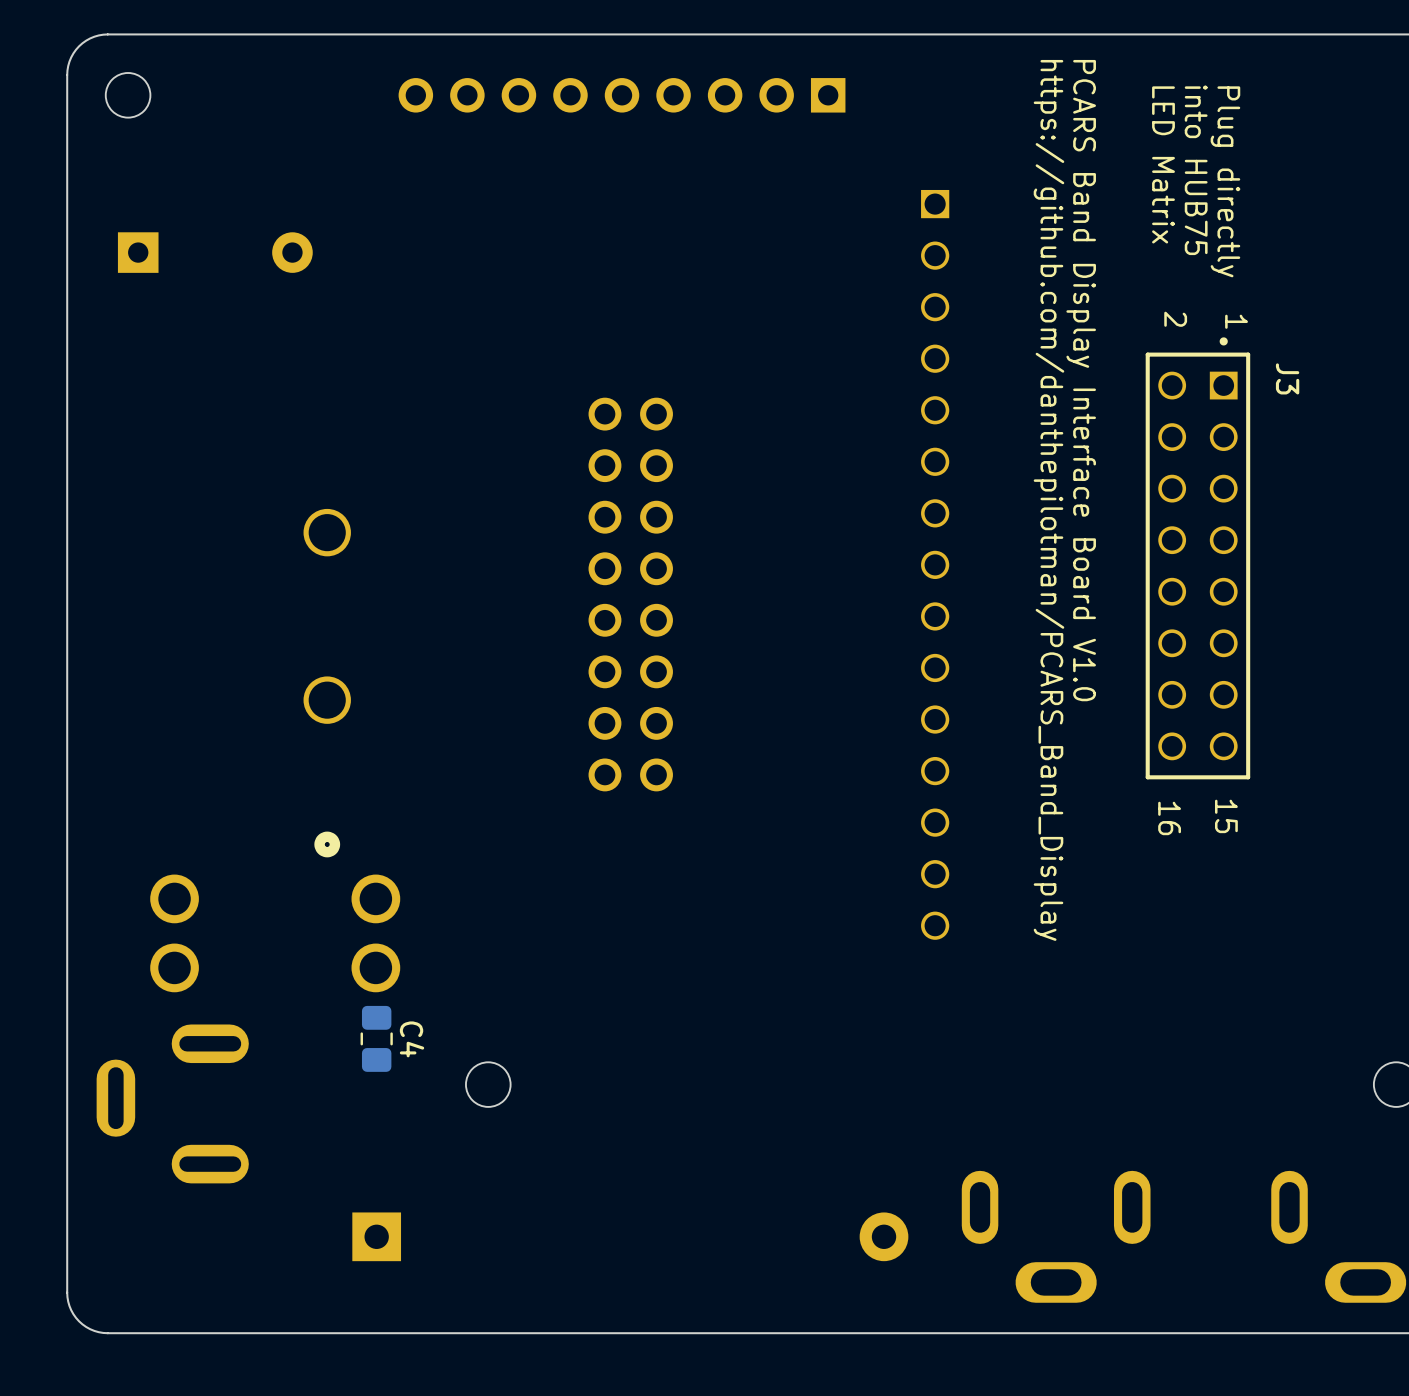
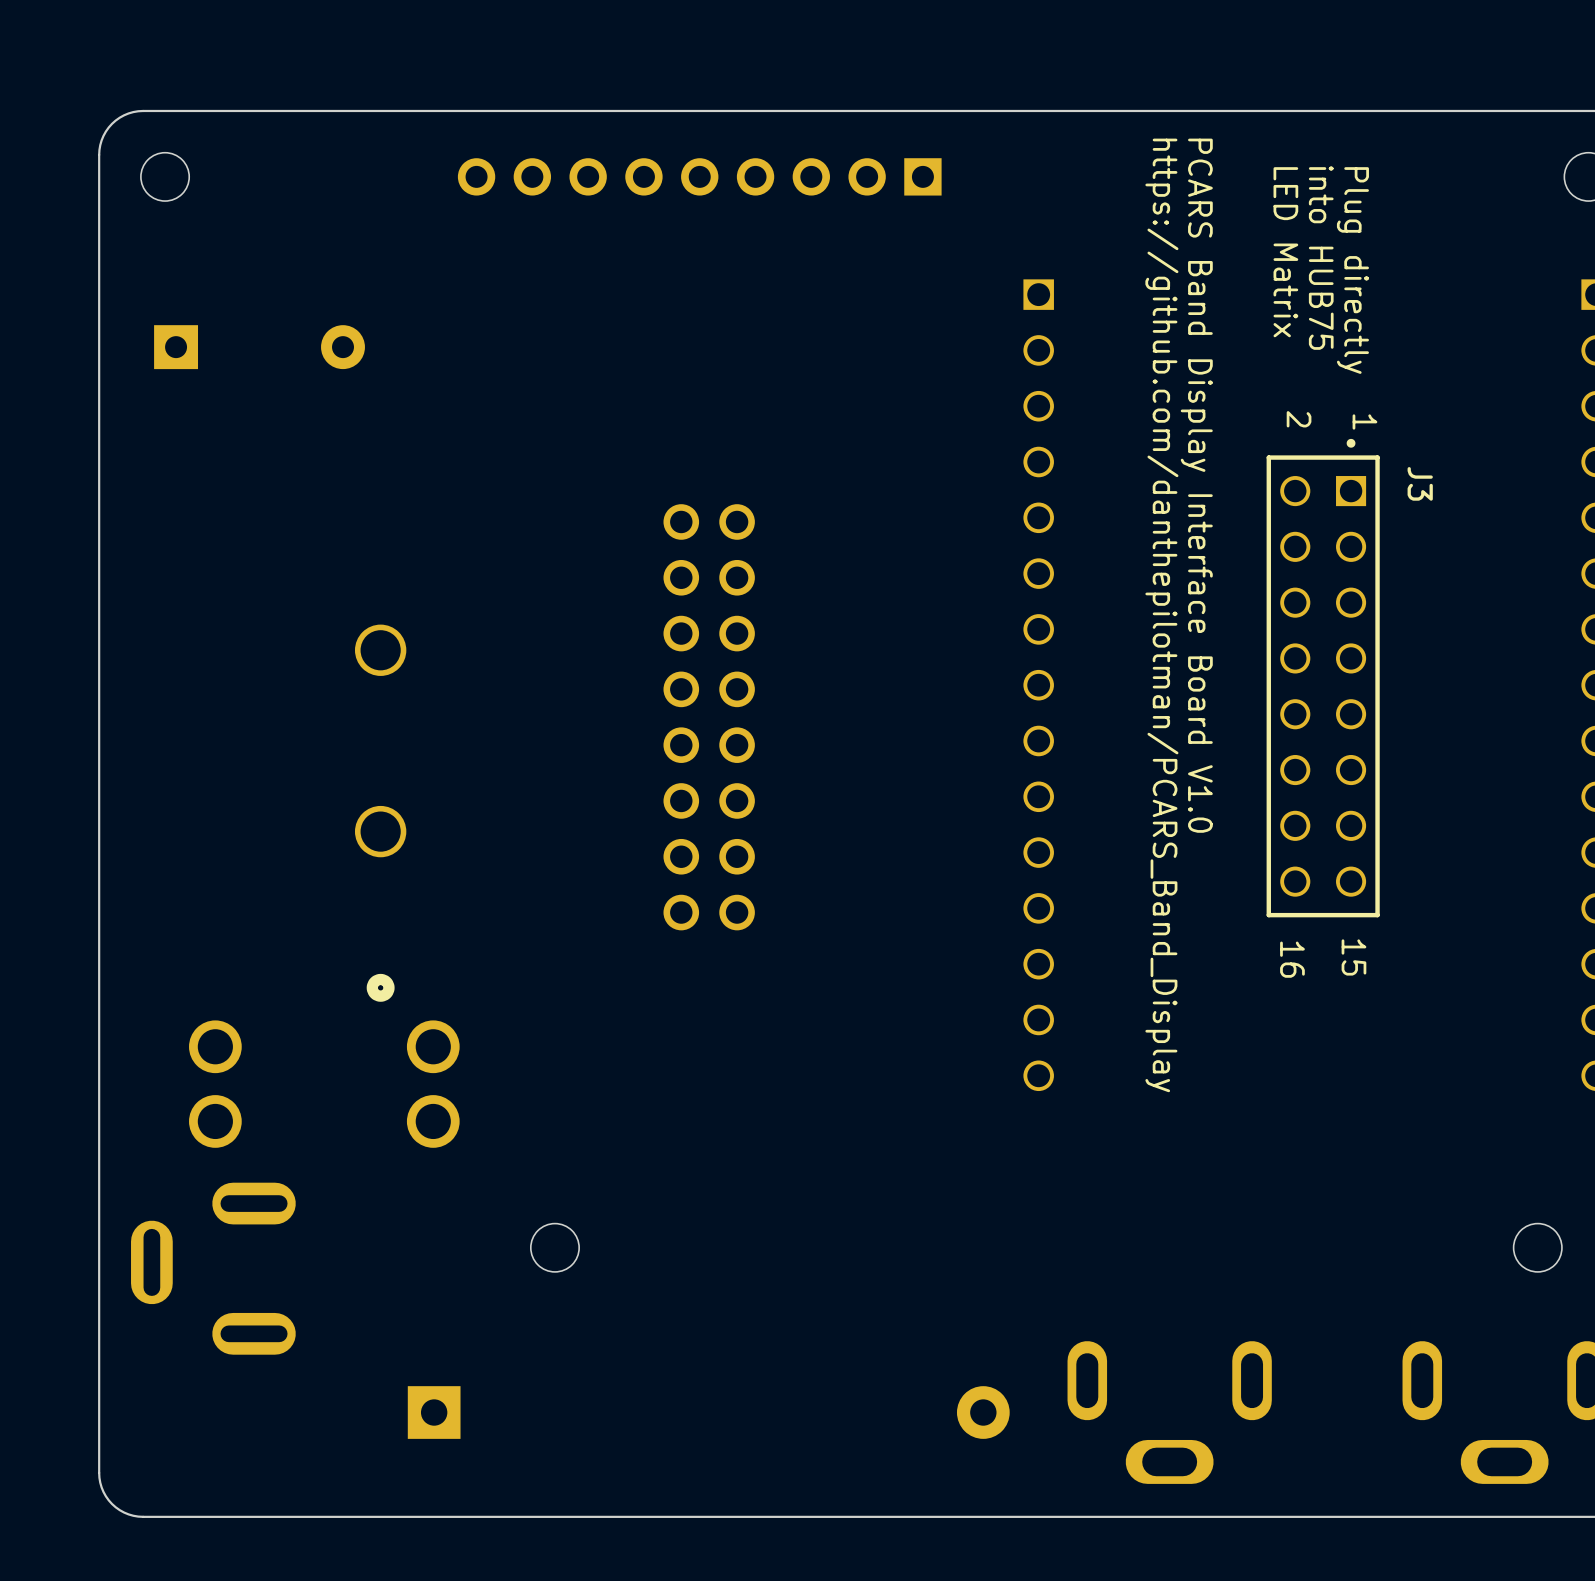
C4: (376, 1038) -> none

